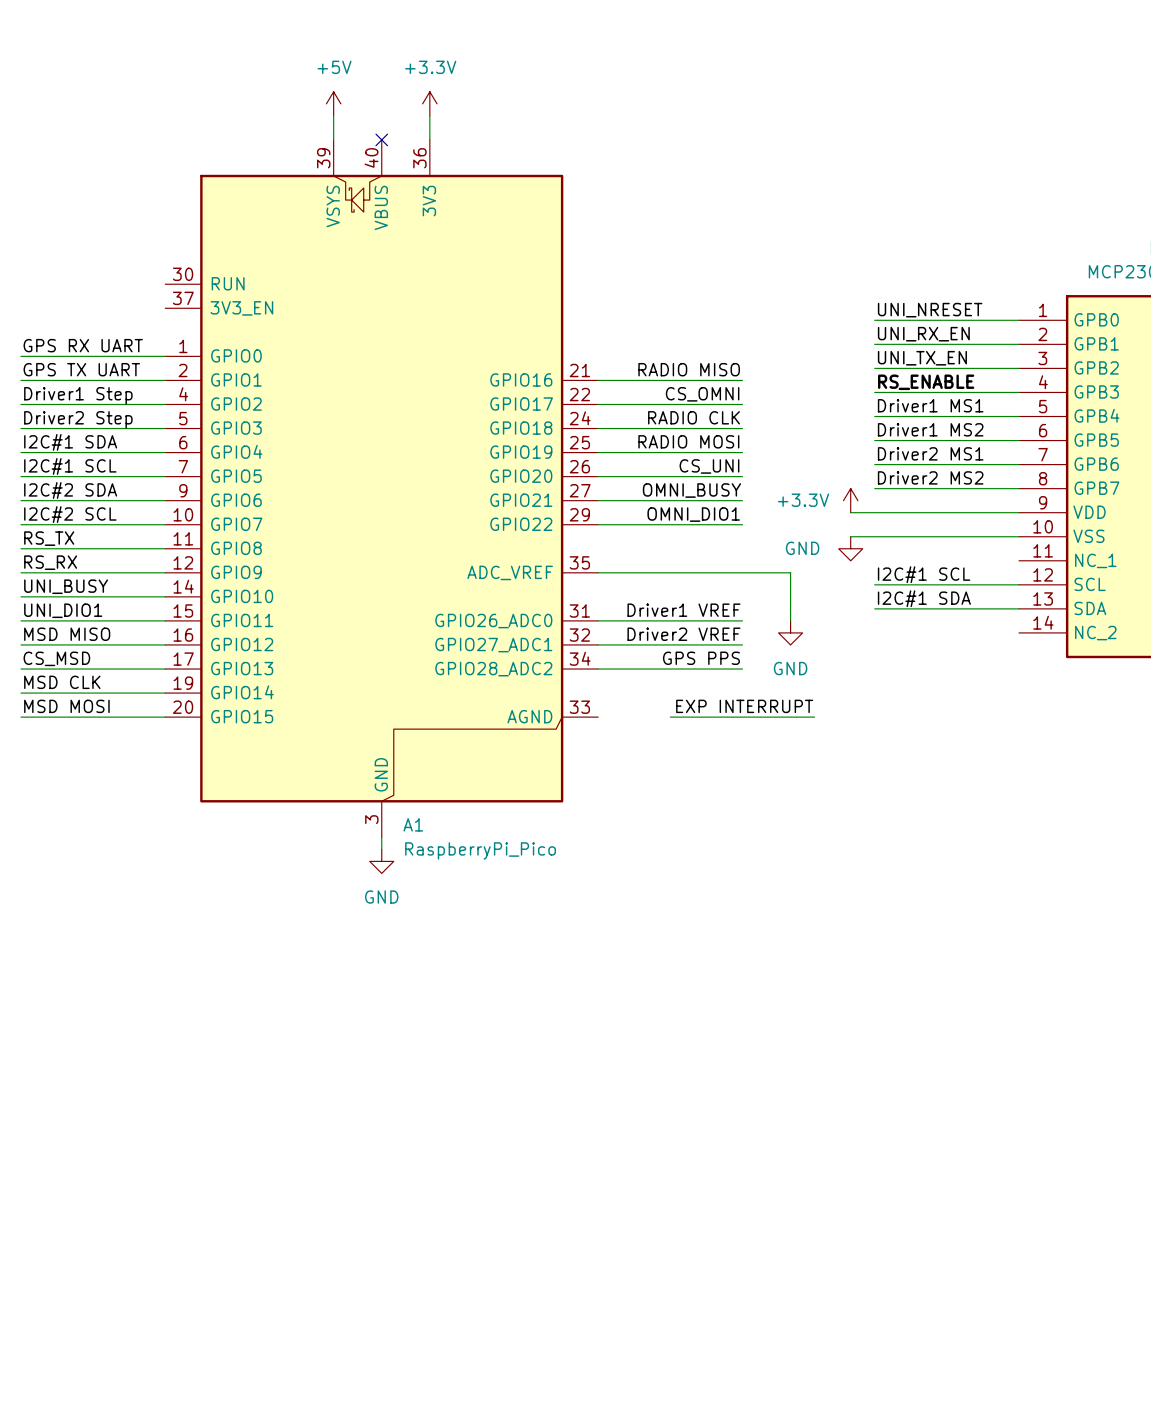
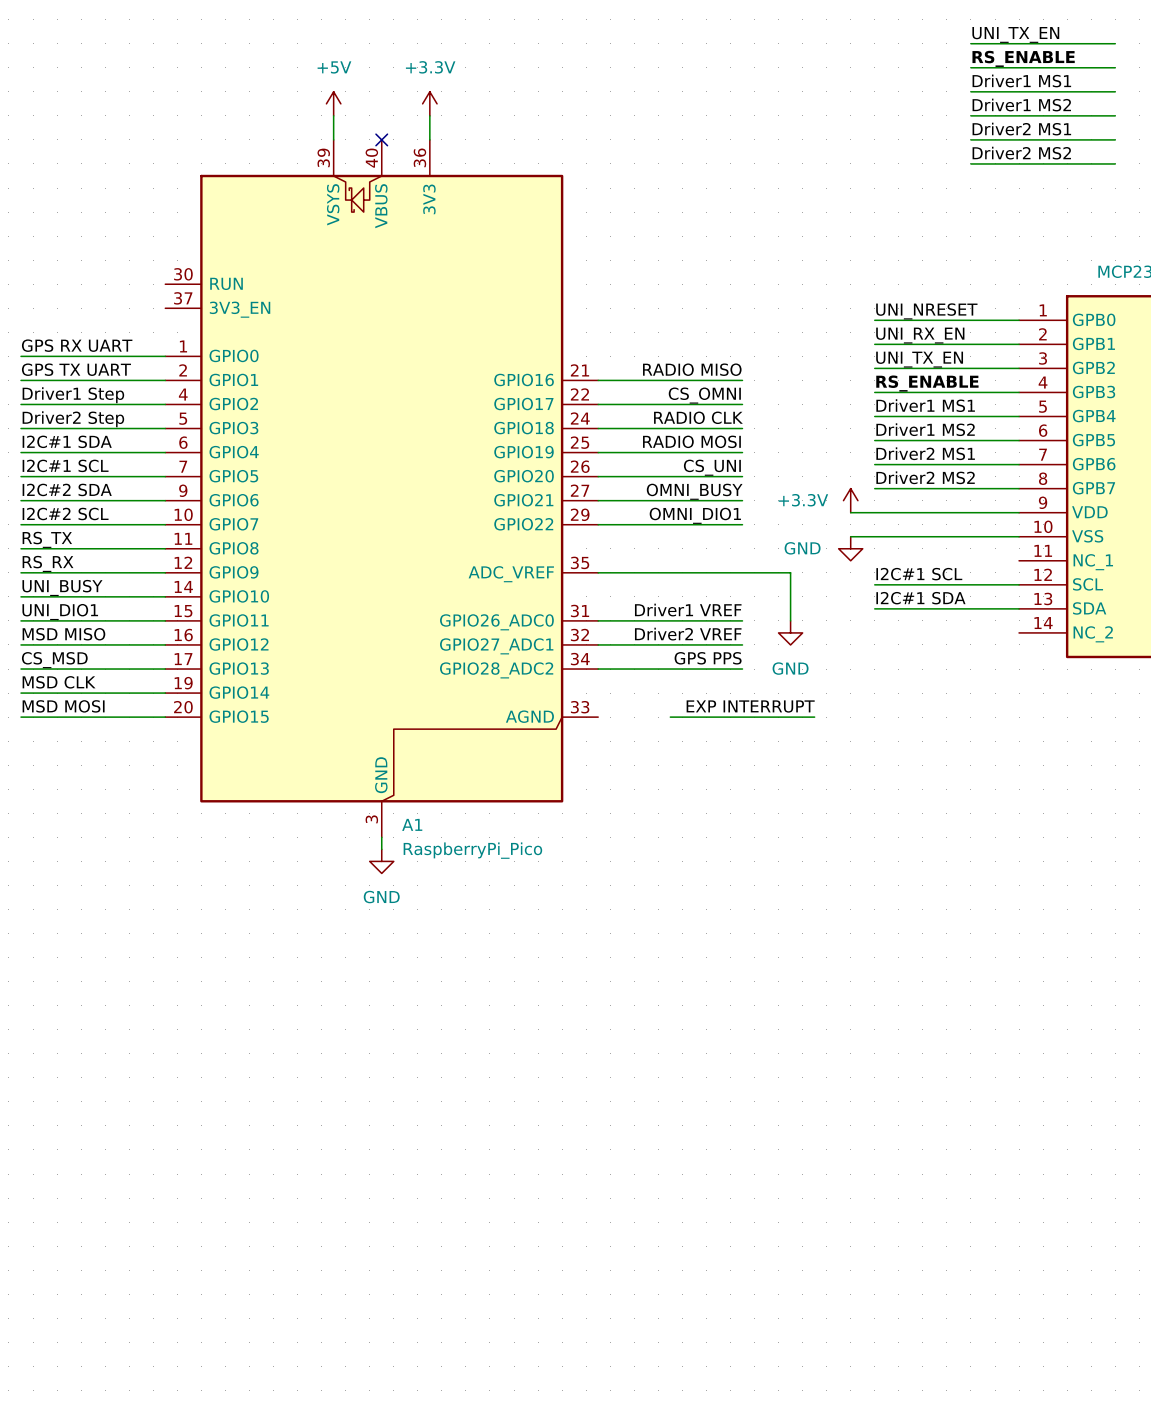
label: none -> UNI_TX_EN (1015, 34)
wire: none -> (970, 43) (1115, 43)
label: none -> RS_ENABLE (1023, 58)
wire: none -> (970, 67) (1115, 67)
label: none -> Driver1 MS1 (1021, 80)
wire: none -> (970, 91) (1115, 91)
label: none -> Driver1 MS2 (1021, 105)
wire: none -> (970, 115) (1115, 115)
label: none -> Driver2 MS1 (1021, 129)
wire: none -> (970, 139) (1115, 139)
label: none -> Driver2 MS2 (1021, 153)
wire: none -> (970, 163) (1115, 163)

